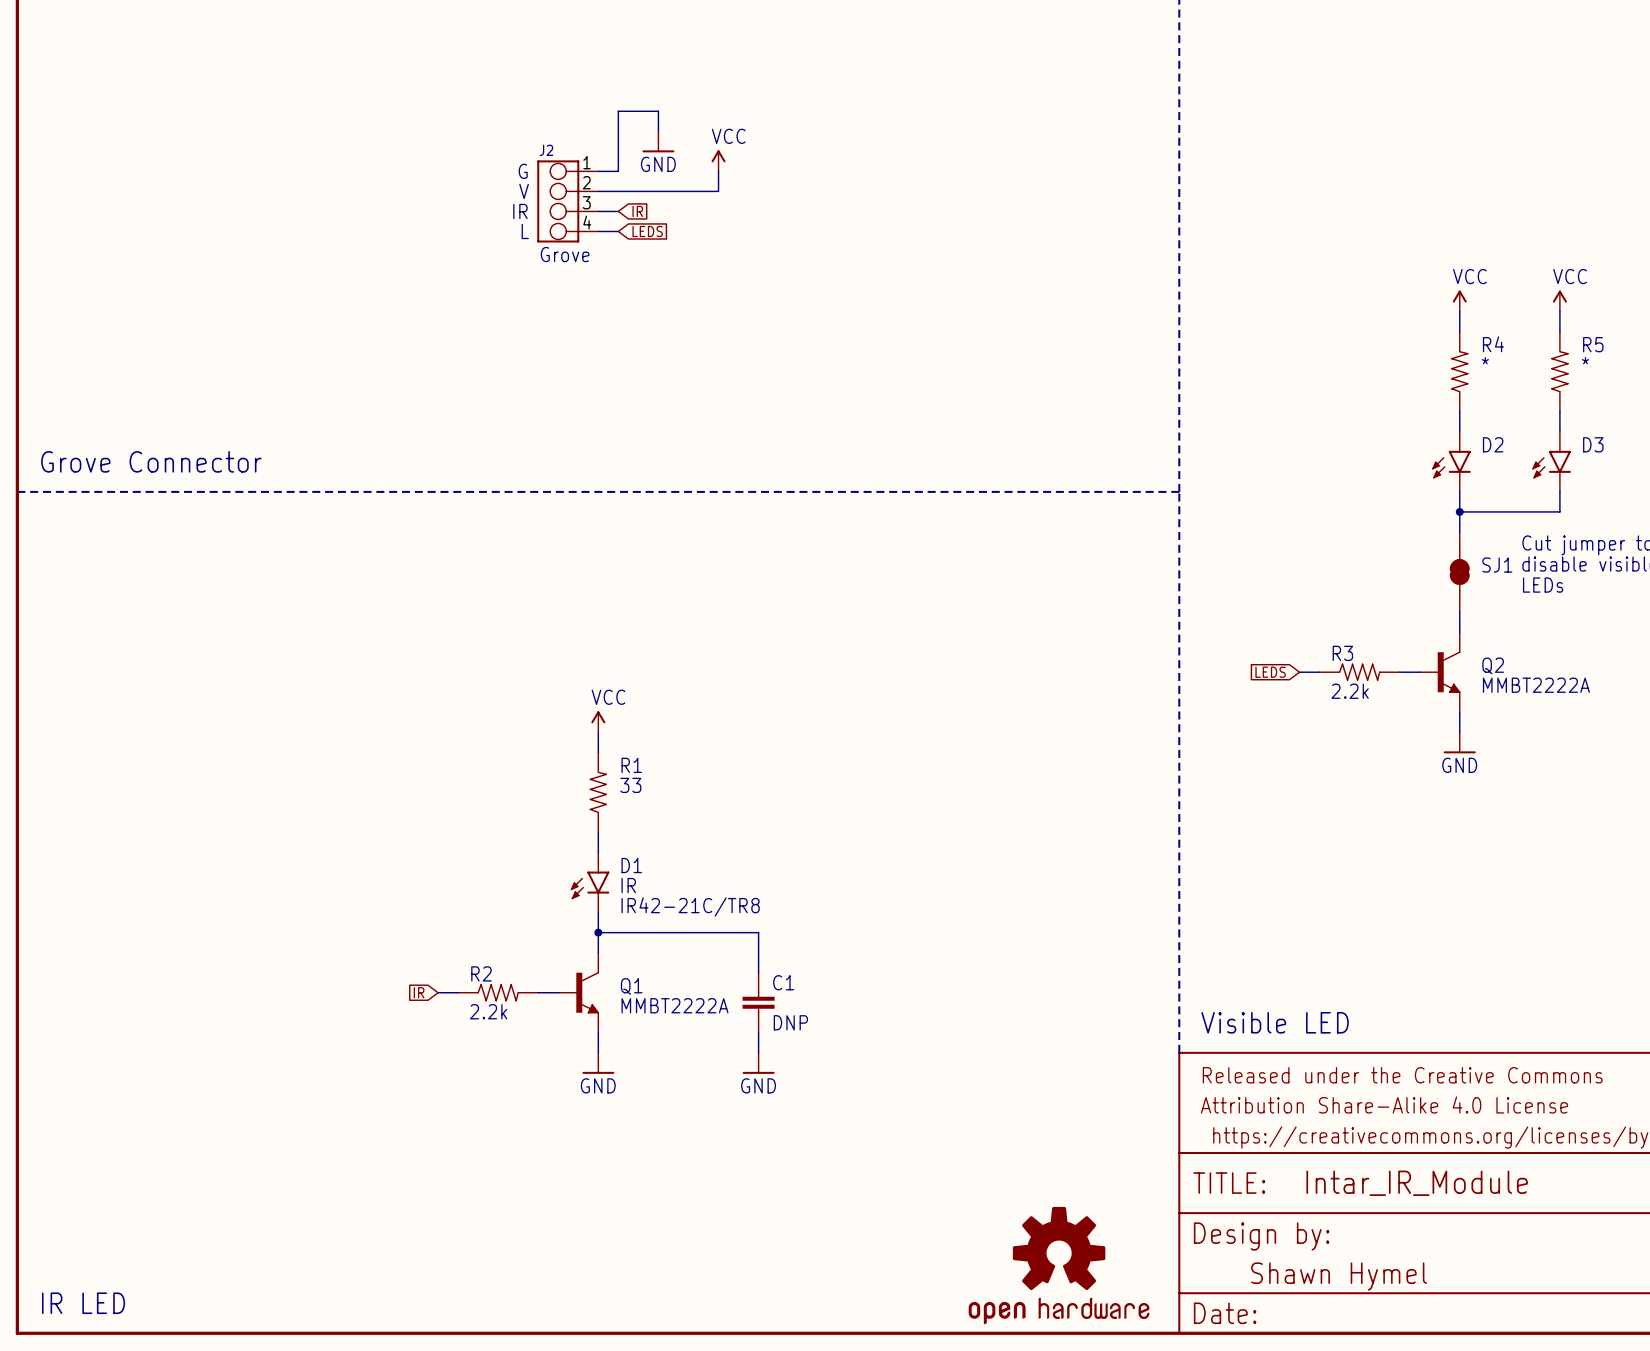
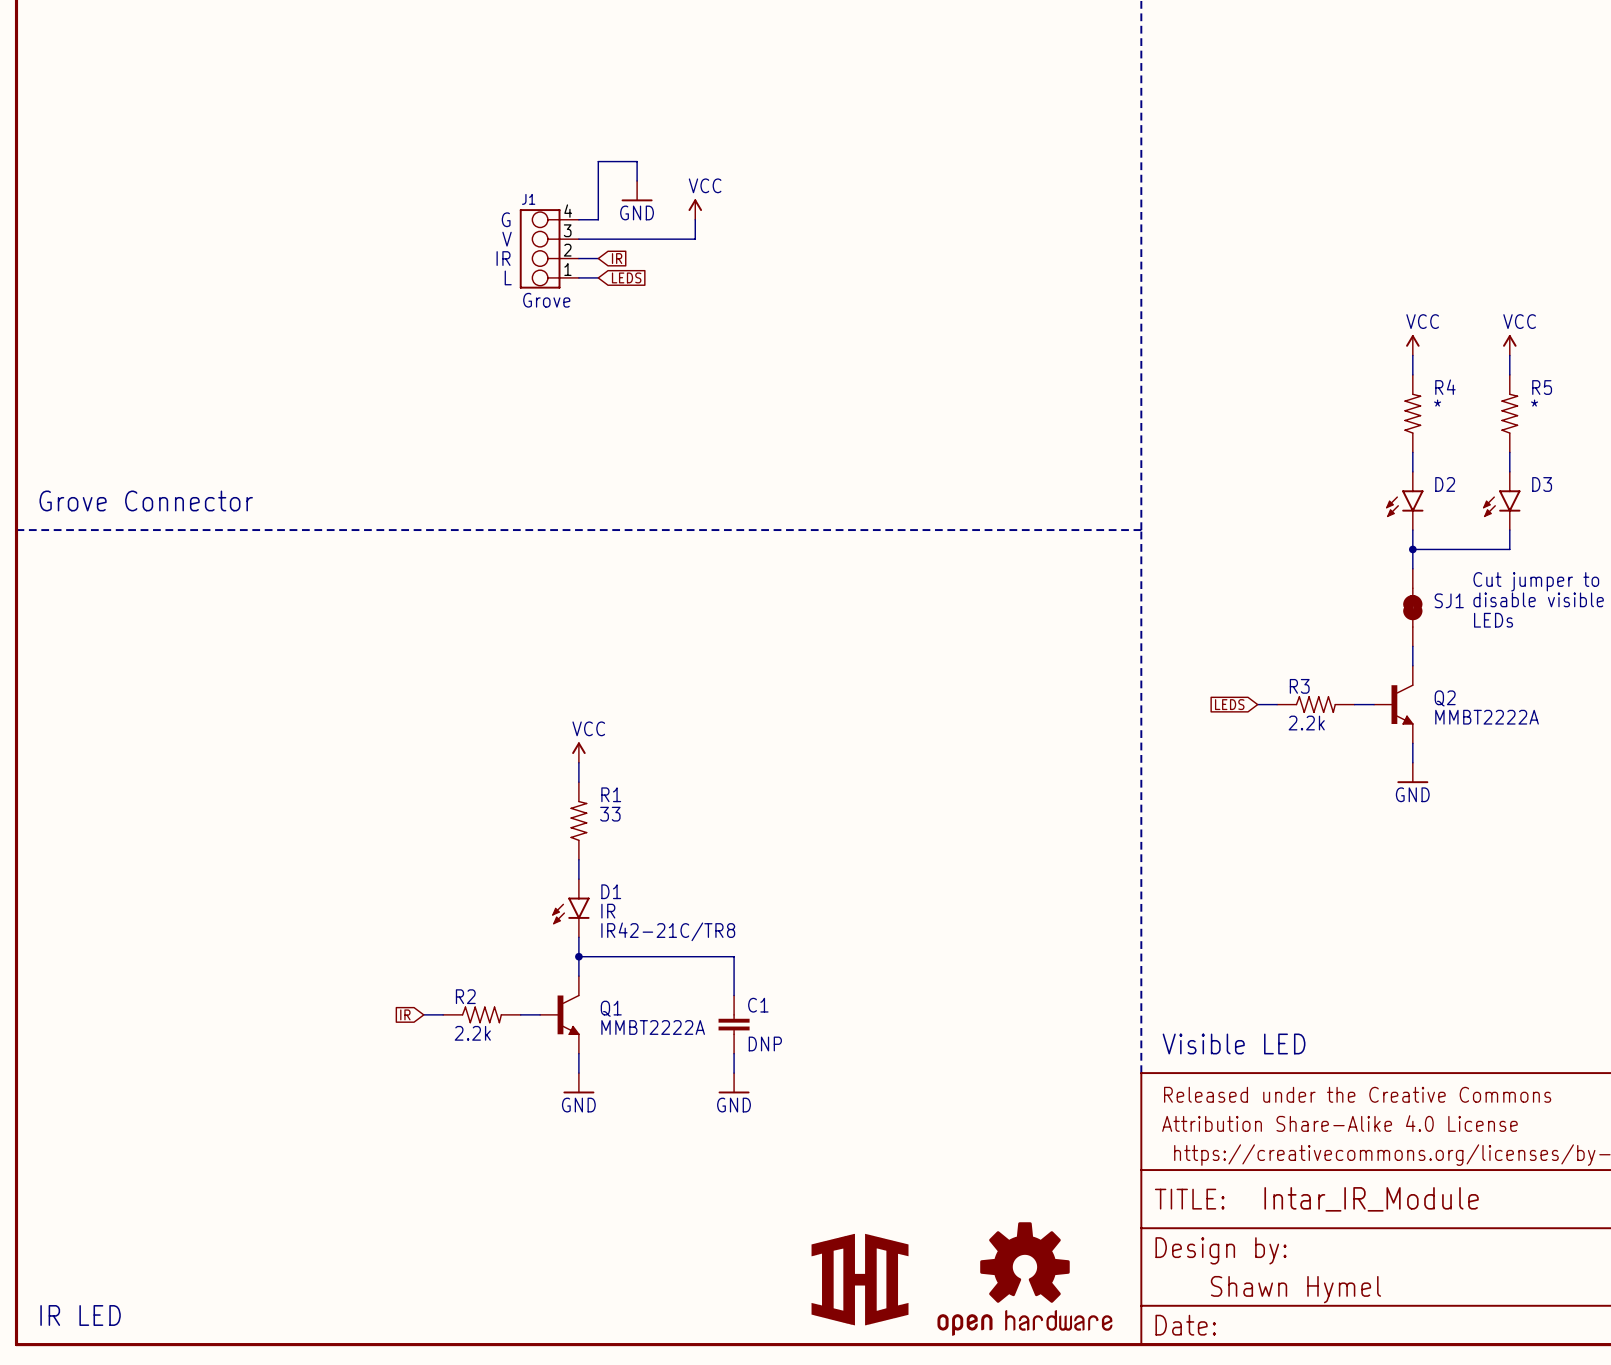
J2 name: J2 (546, 150) -> J1 (528, 199)
J2 flip: as is (558, 201) -> up-down (540, 248)
part: none -> (860, 1279)

